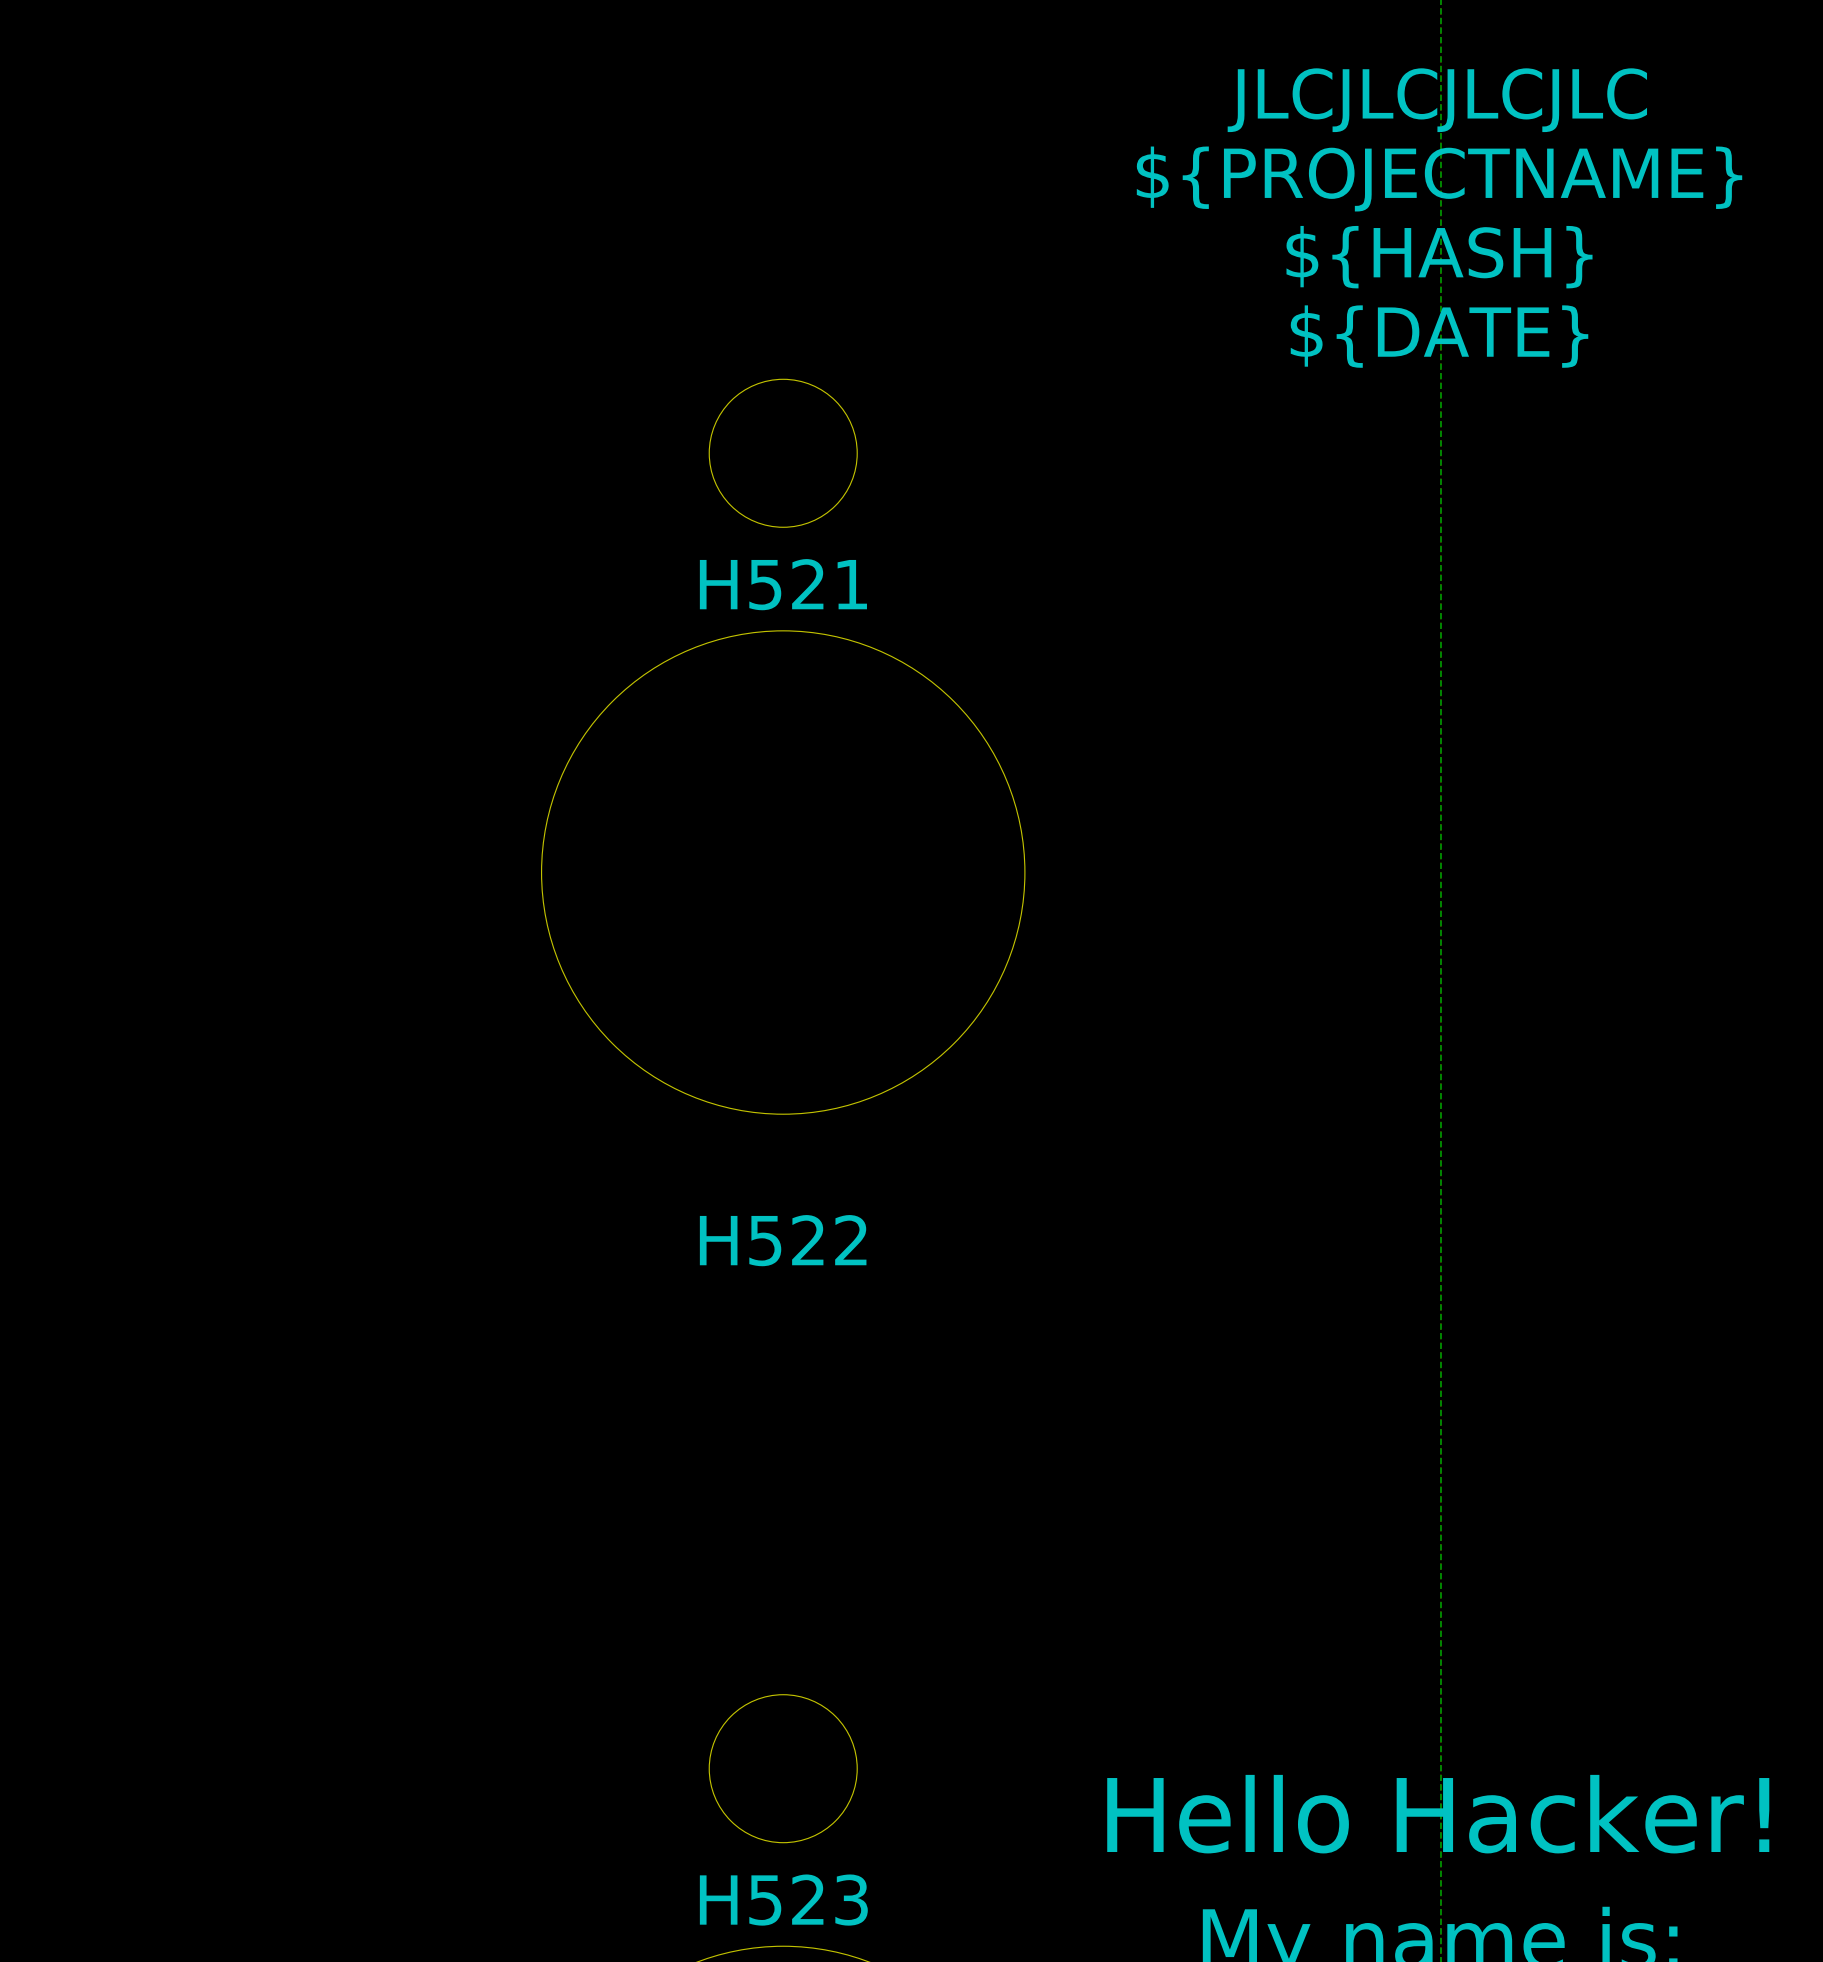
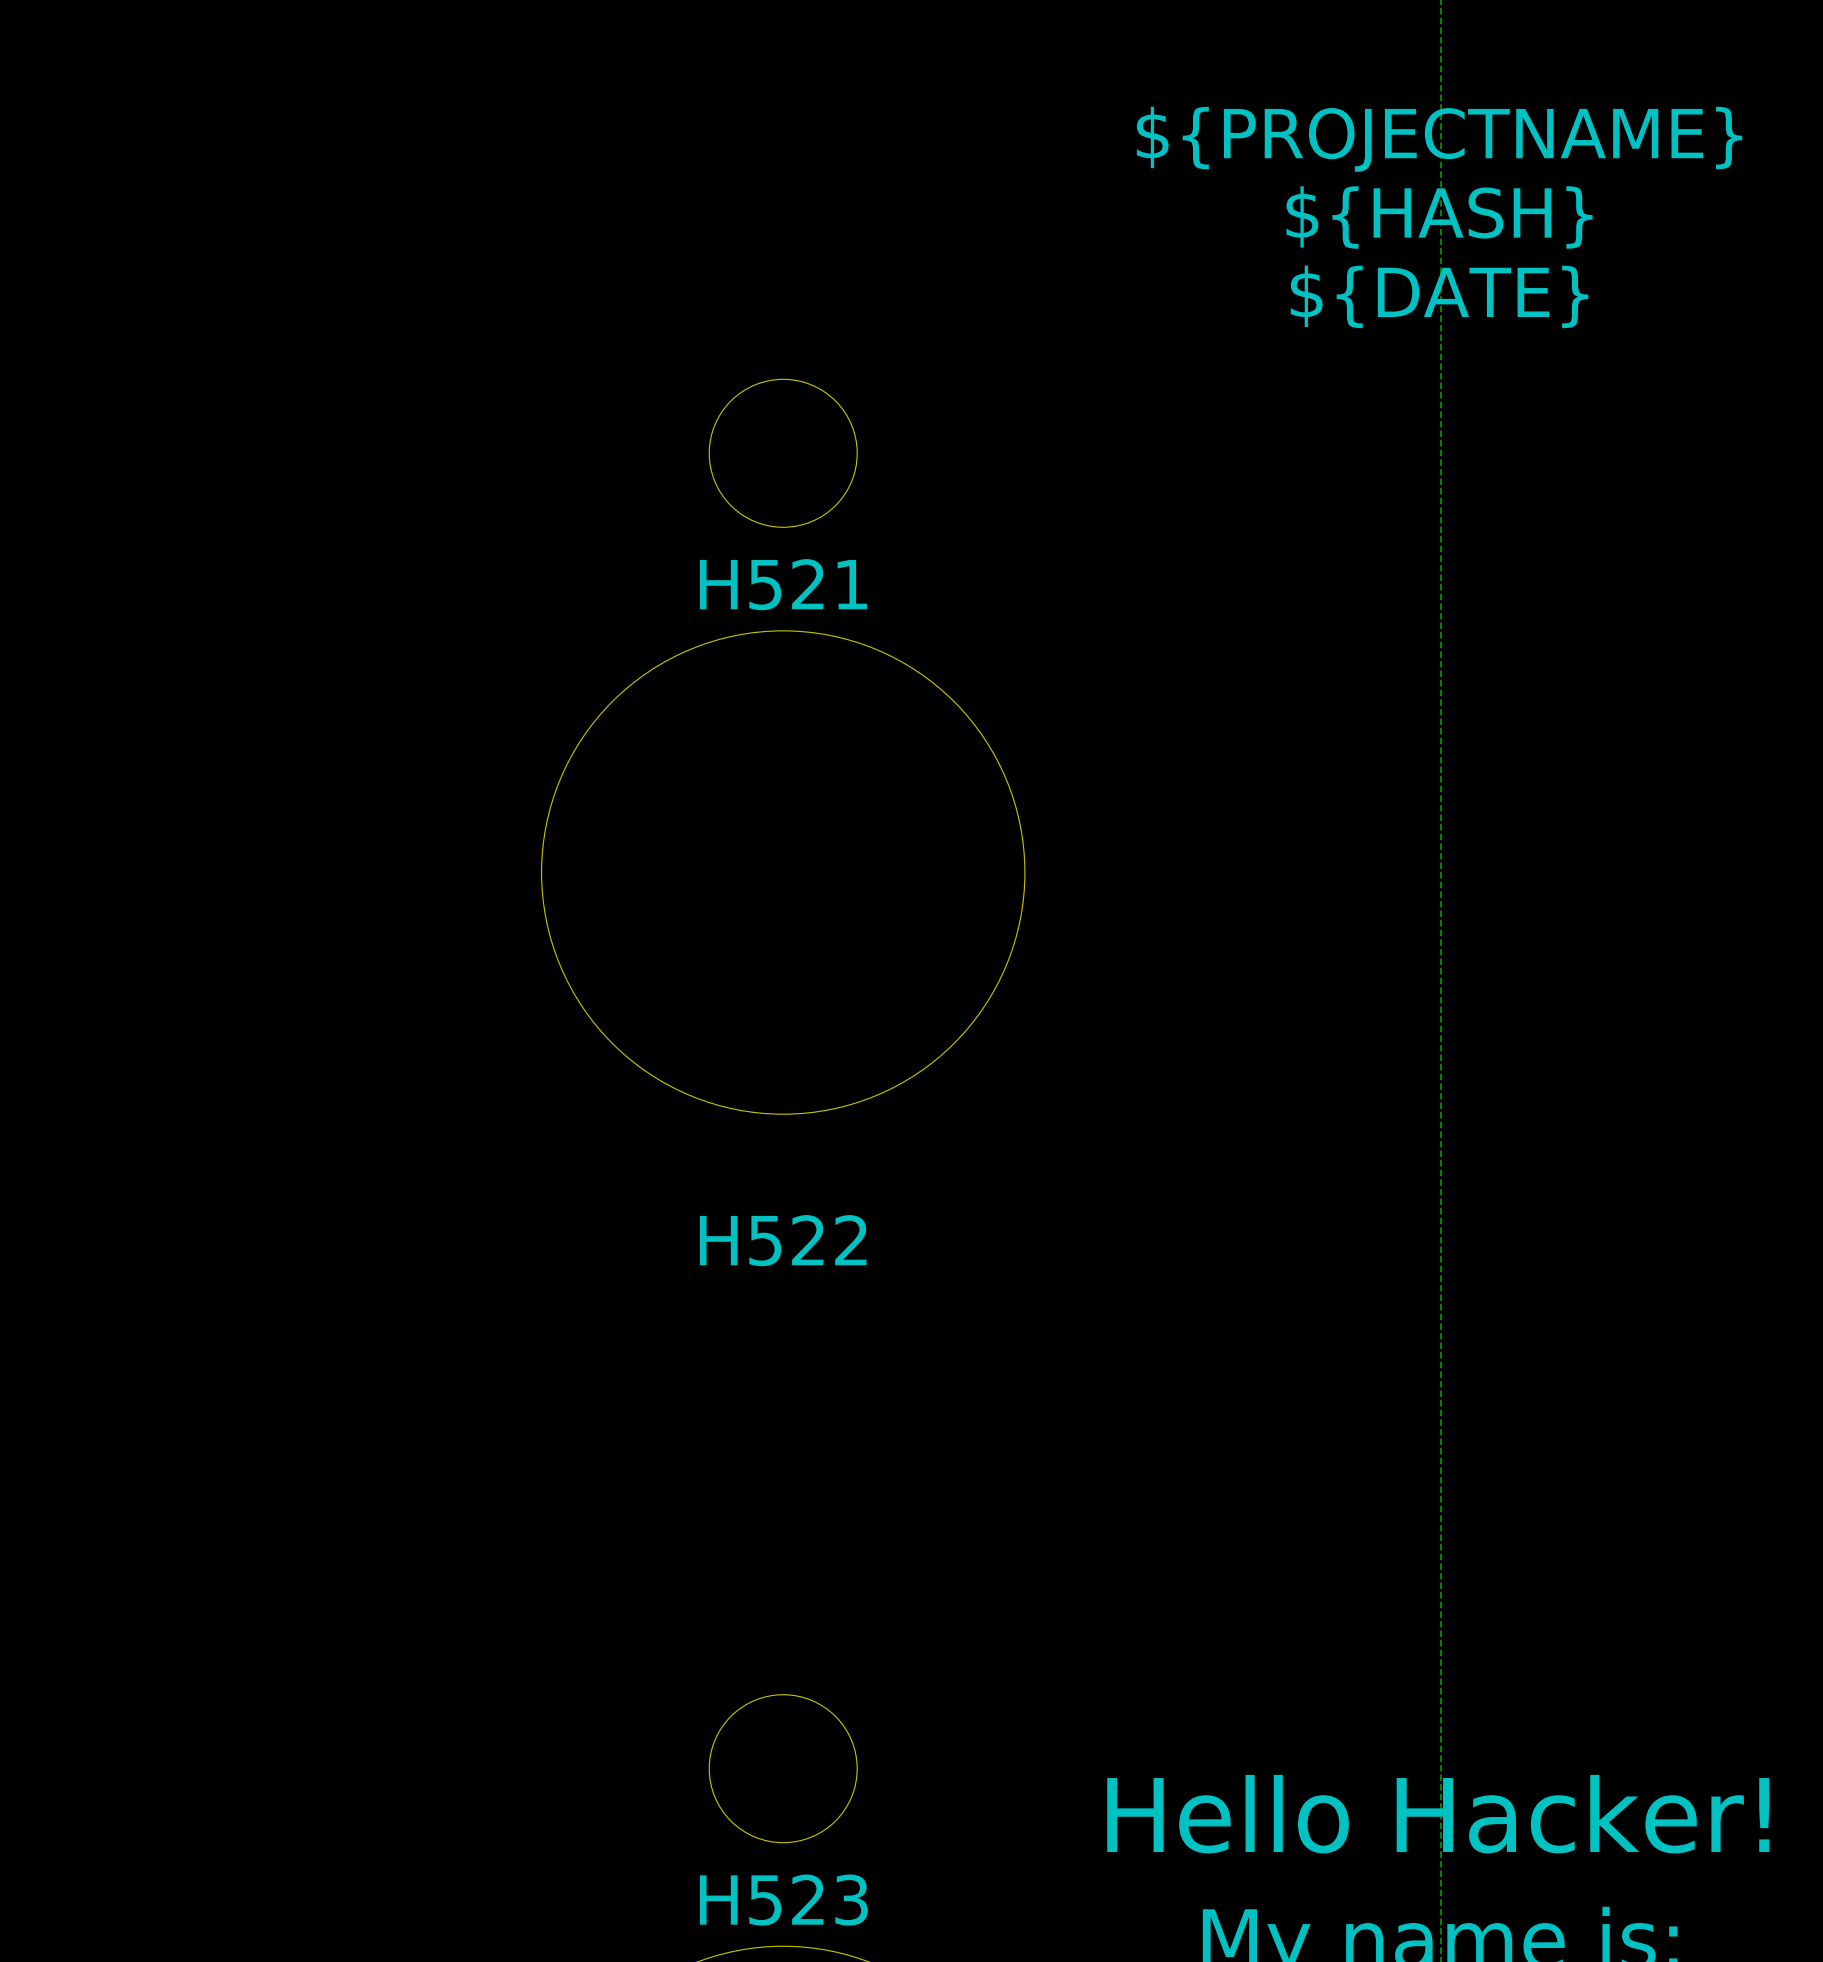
text: JLCJLCJLCJLC (1437, 100) -> none
text position: ${PROJECTNAME} (1439, 179) -> ${PROJECTNAME} (1439, 139)
text position: ${HASH} (1439, 257) -> ${HASH} (1439, 217)
text position: ${DATE} (1439, 336) -> ${DATE} (1439, 296)

